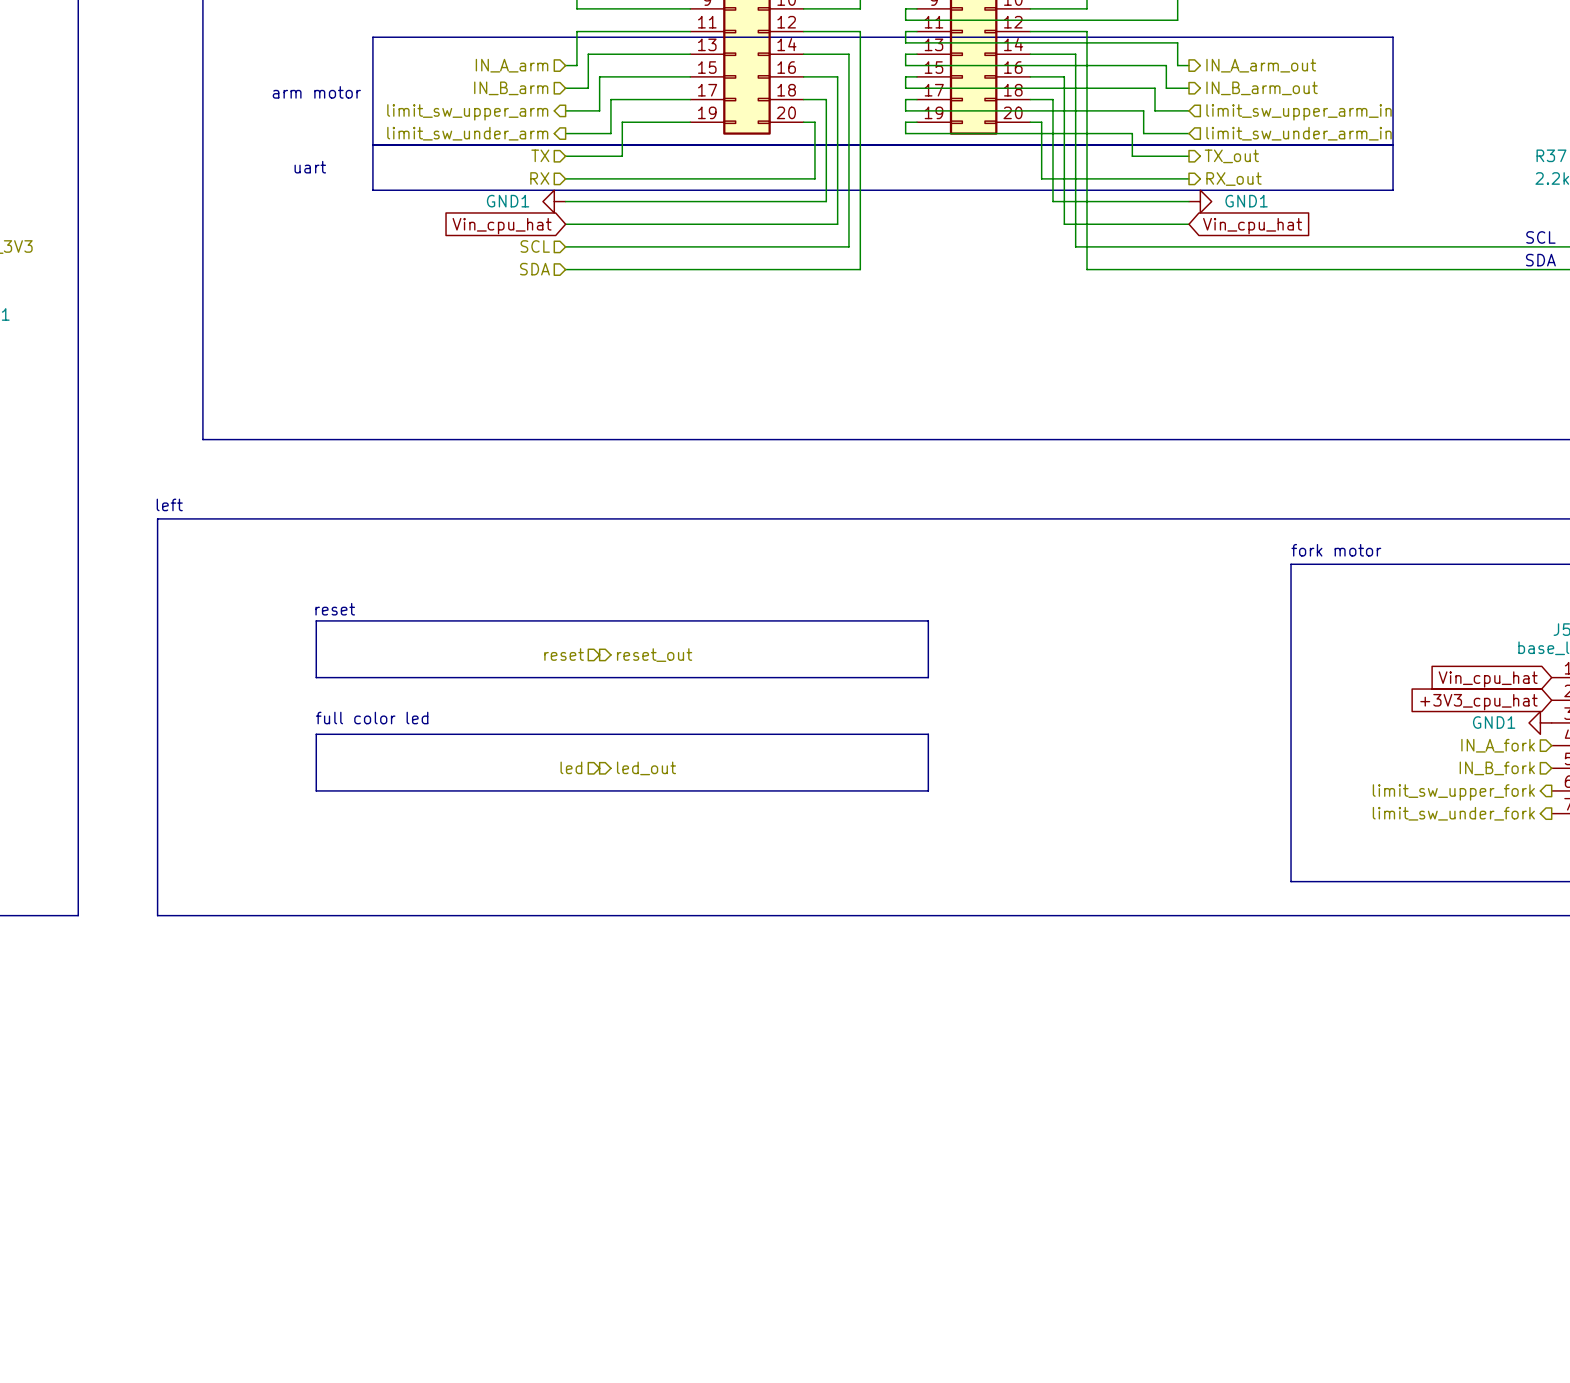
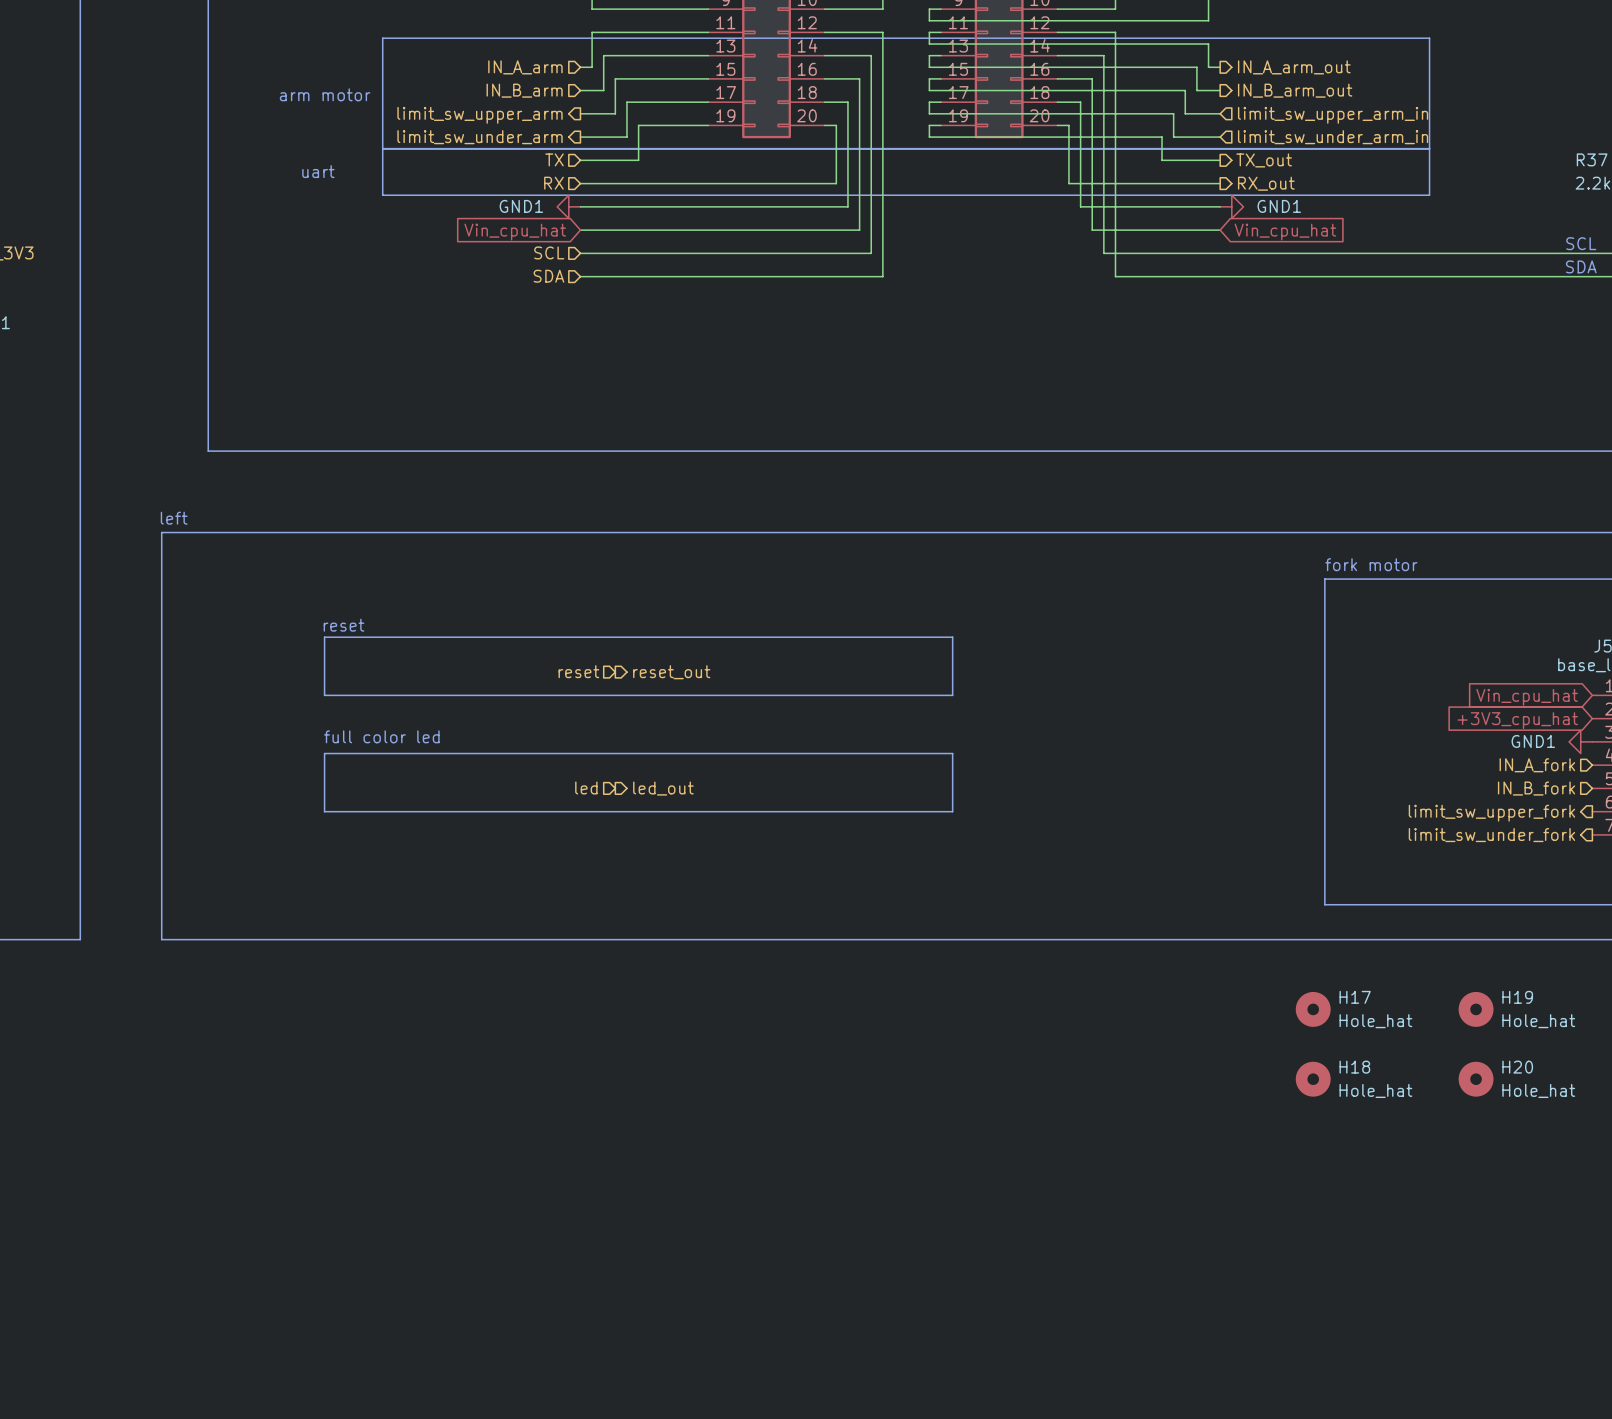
H17: none -> Hole_hat (1313, 1009)
H19: none -> Hole_hat (1476, 1009)
H18: none -> Hole_hat (1313, 1079)
H20: none -> Hole_hat (1476, 1079)

